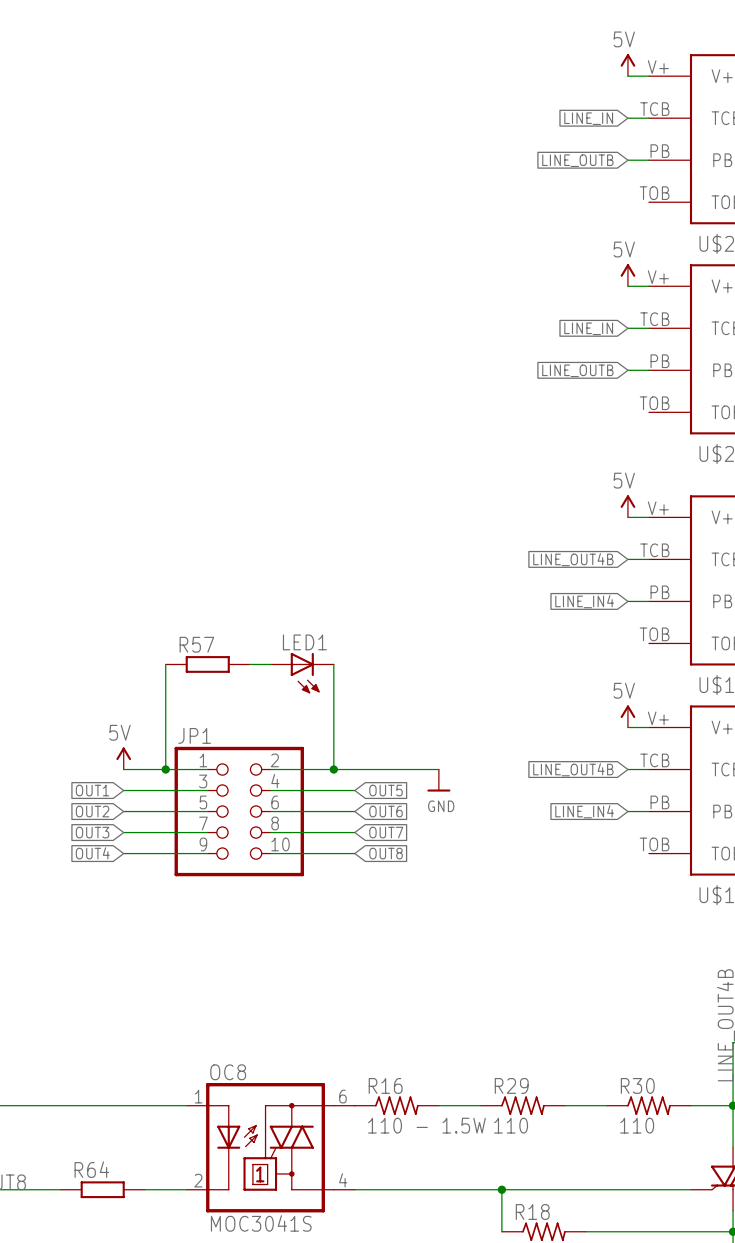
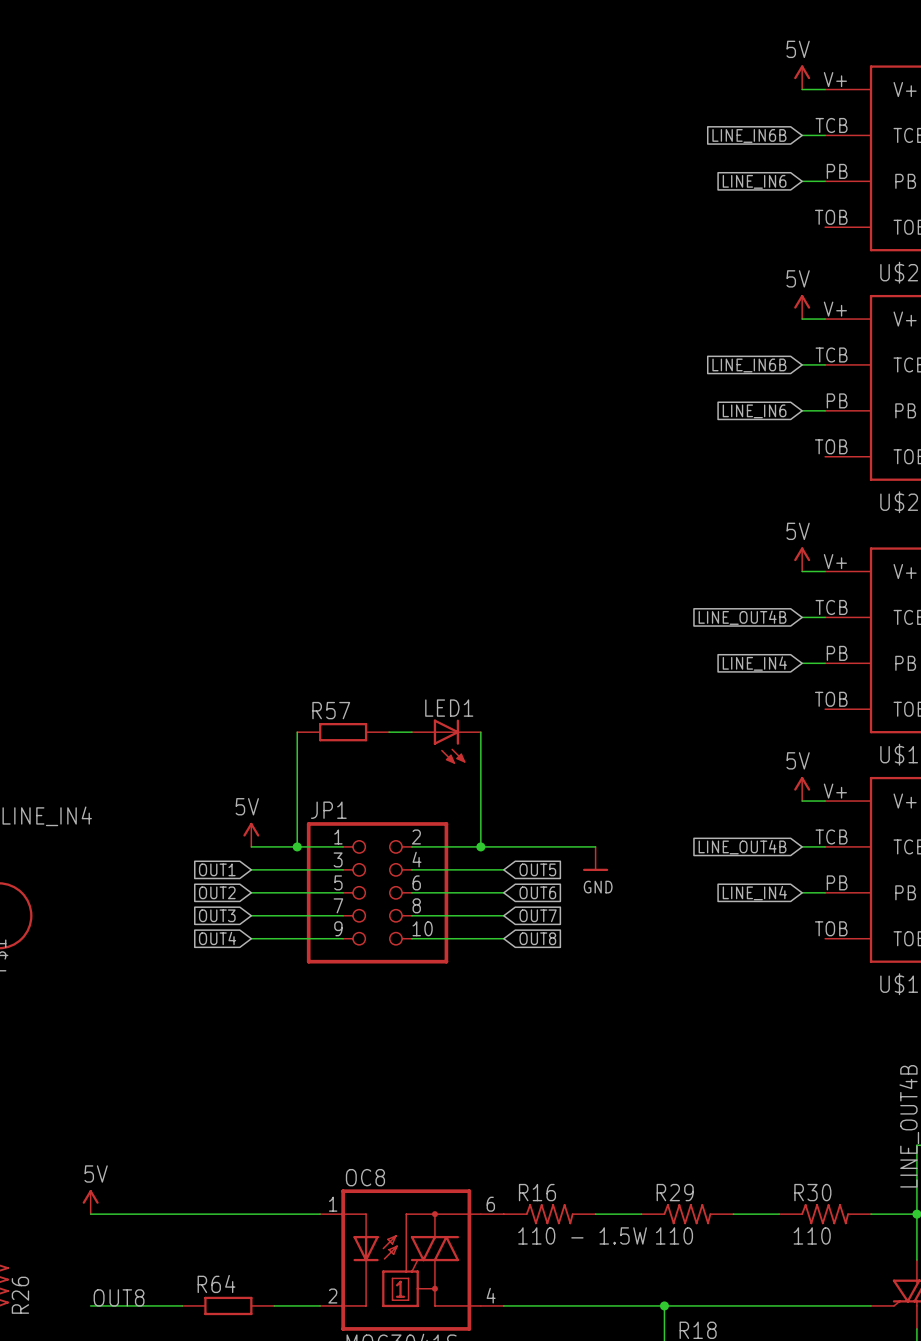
global label: LINE_IN (588, 118) -> LINE_IN6B (749, 135)
global label: LINE_OUTB (577, 160) -> LINE_IN6 (754, 181)
global label: LINE_IN (588, 328) -> LINE_IN6B (749, 365)
global label: LINE_OUTB (577, 370) -> LINE_IN6 (754, 411)

